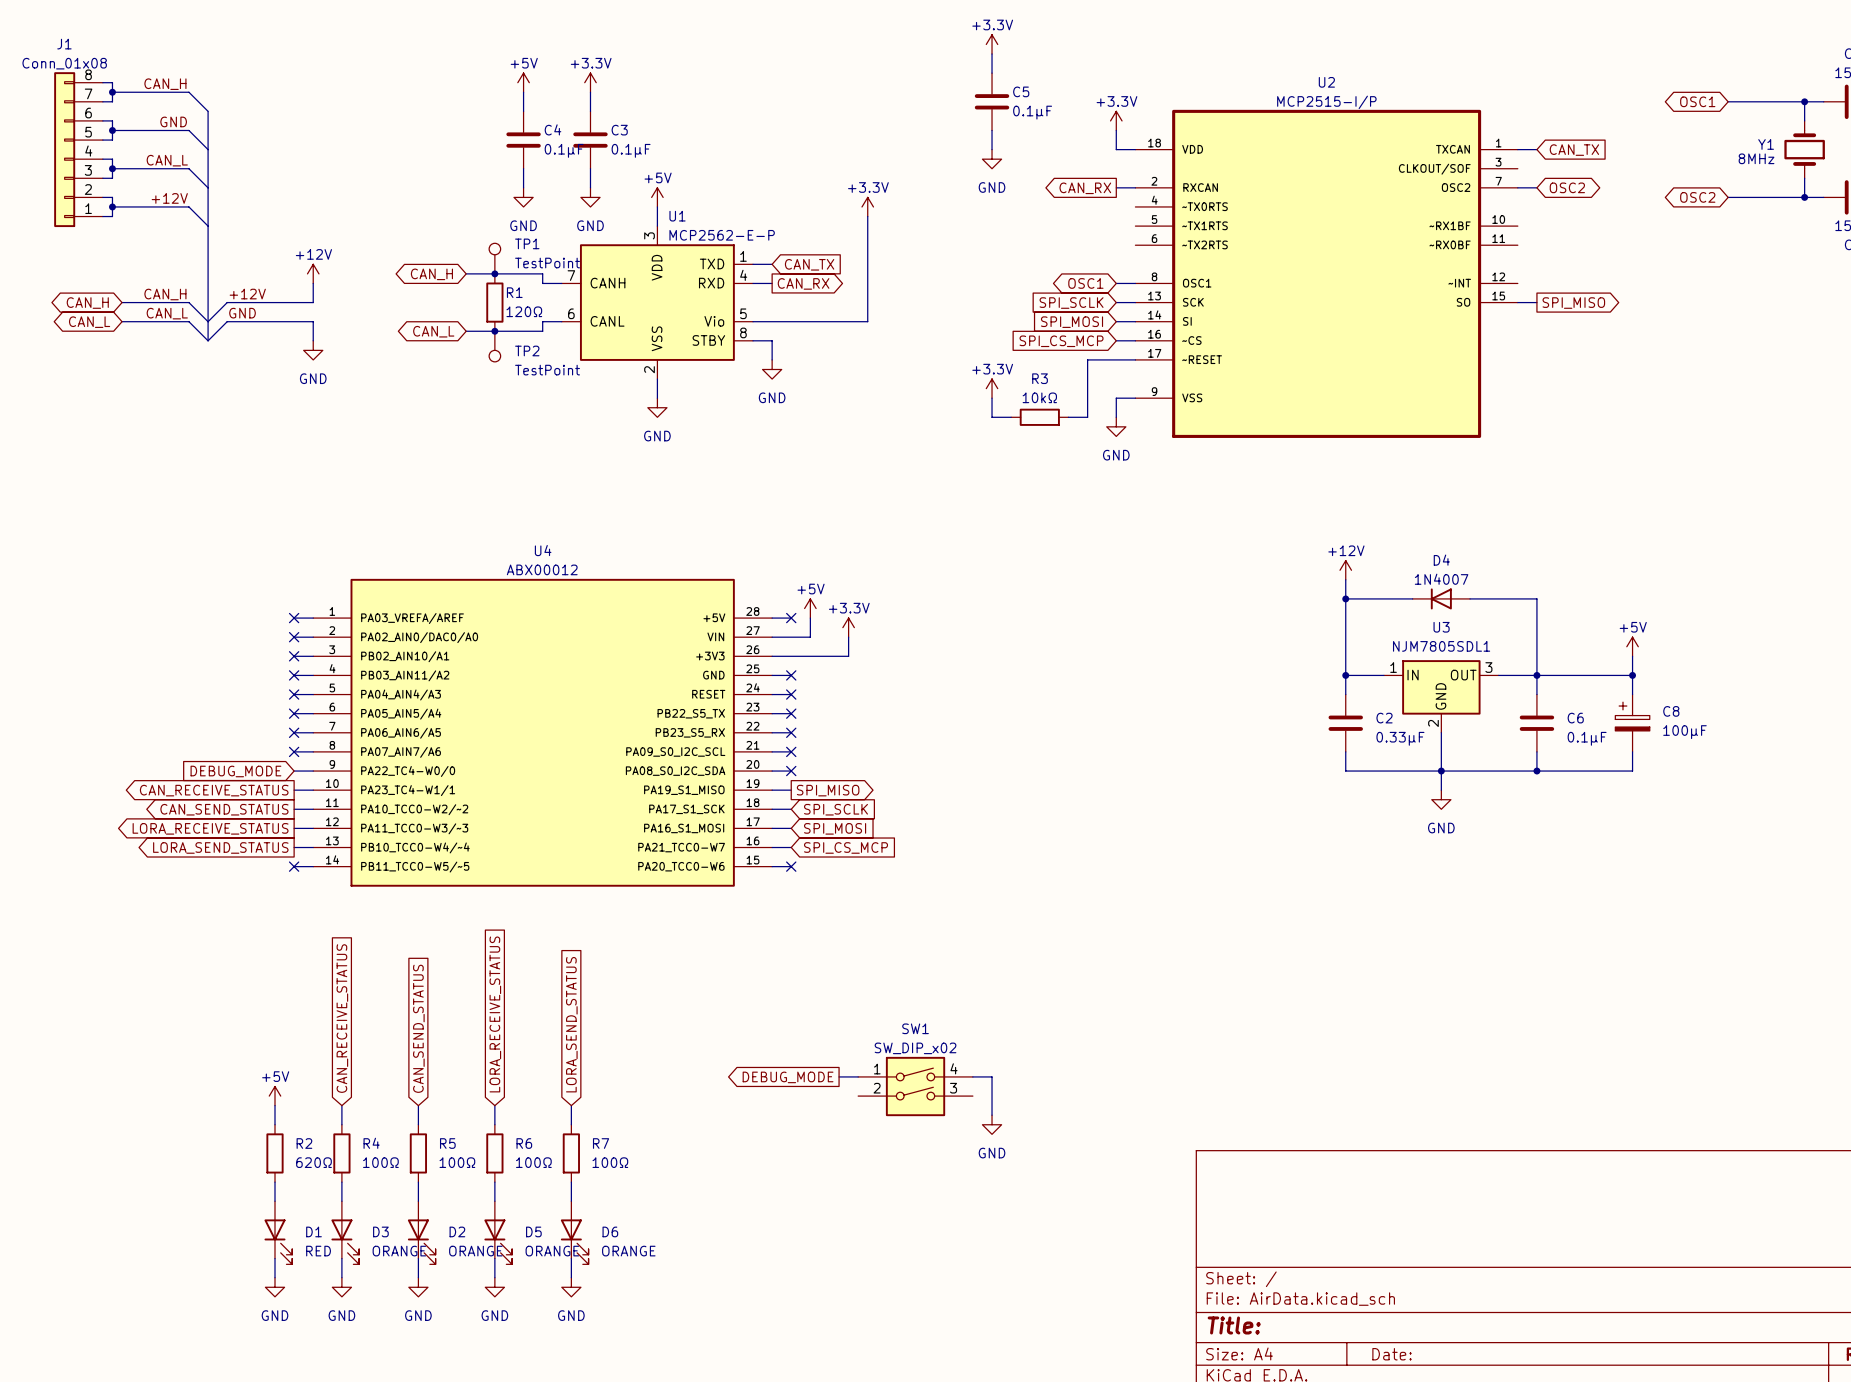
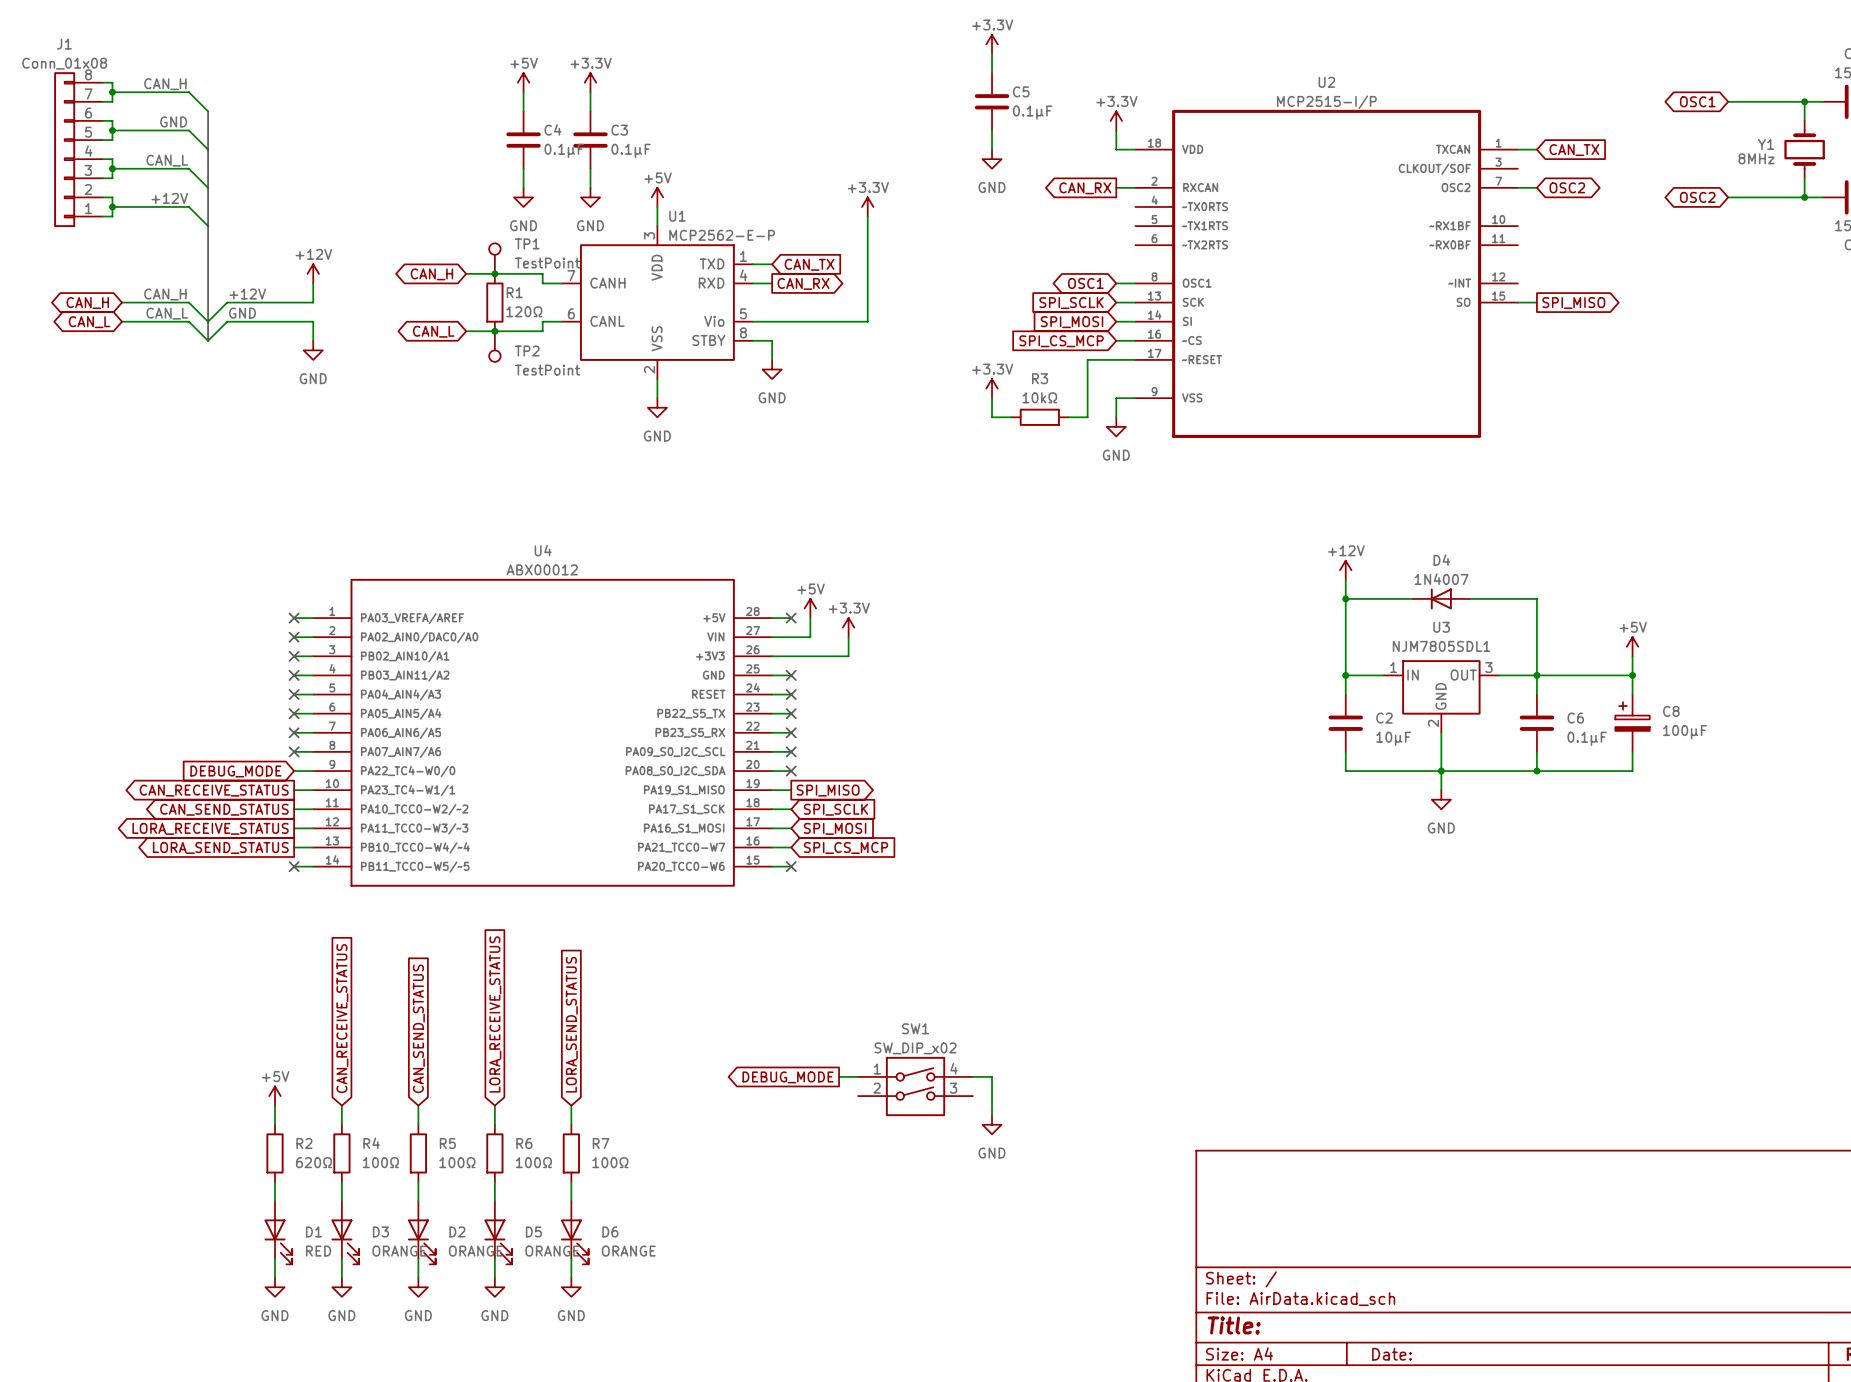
C2 value: 0.33μF (1400, 738) -> 10μF (1393, 738)

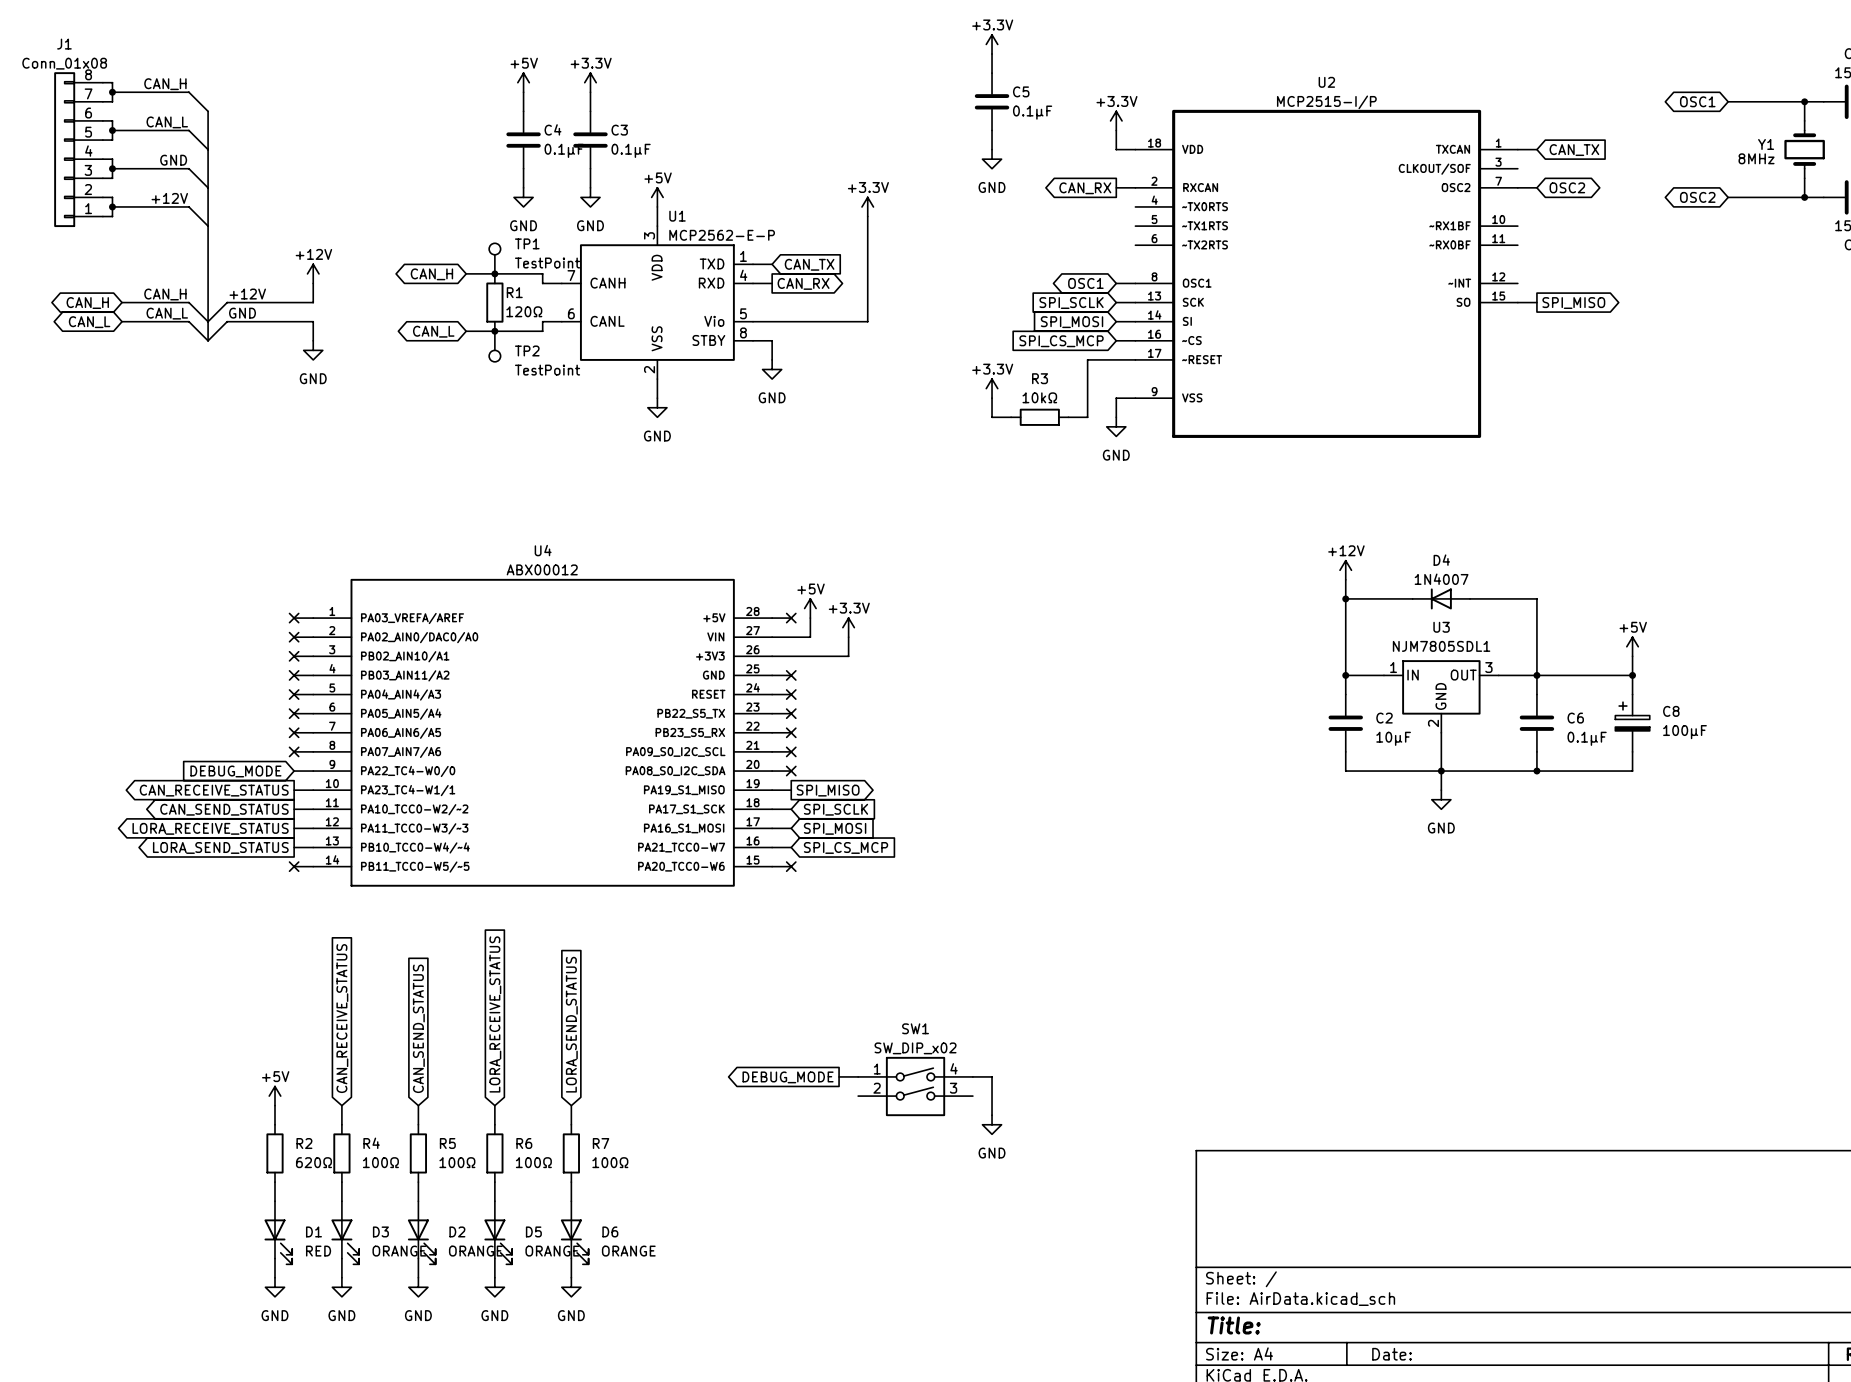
label: GND (173, 121) -> CAN_L (167, 122)
label: CAN_L (167, 160) -> GND (173, 160)

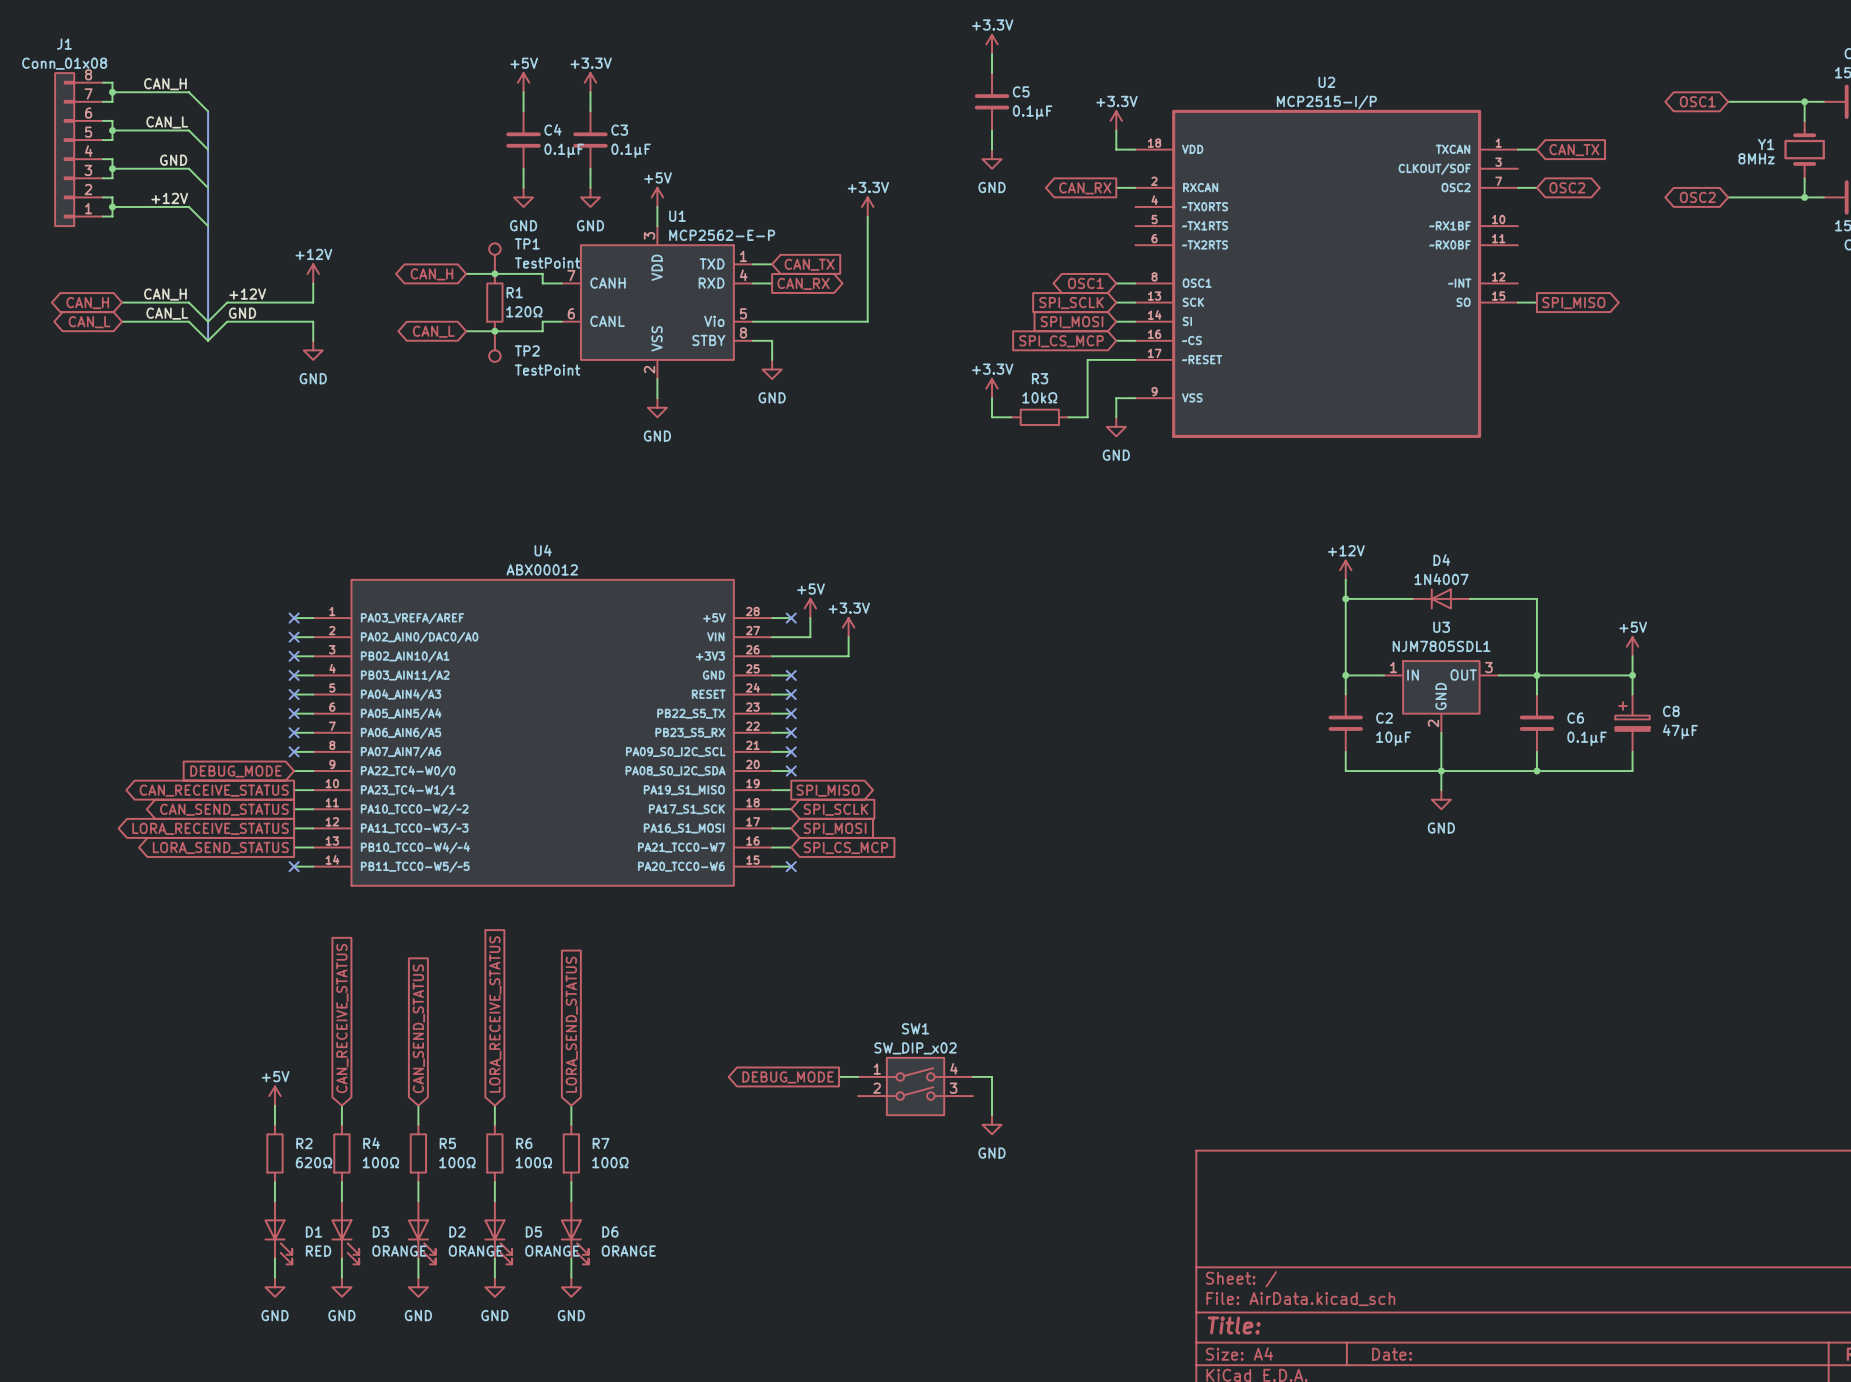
C8 value: 100μF (1684, 732) -> 47μF (1680, 731)

